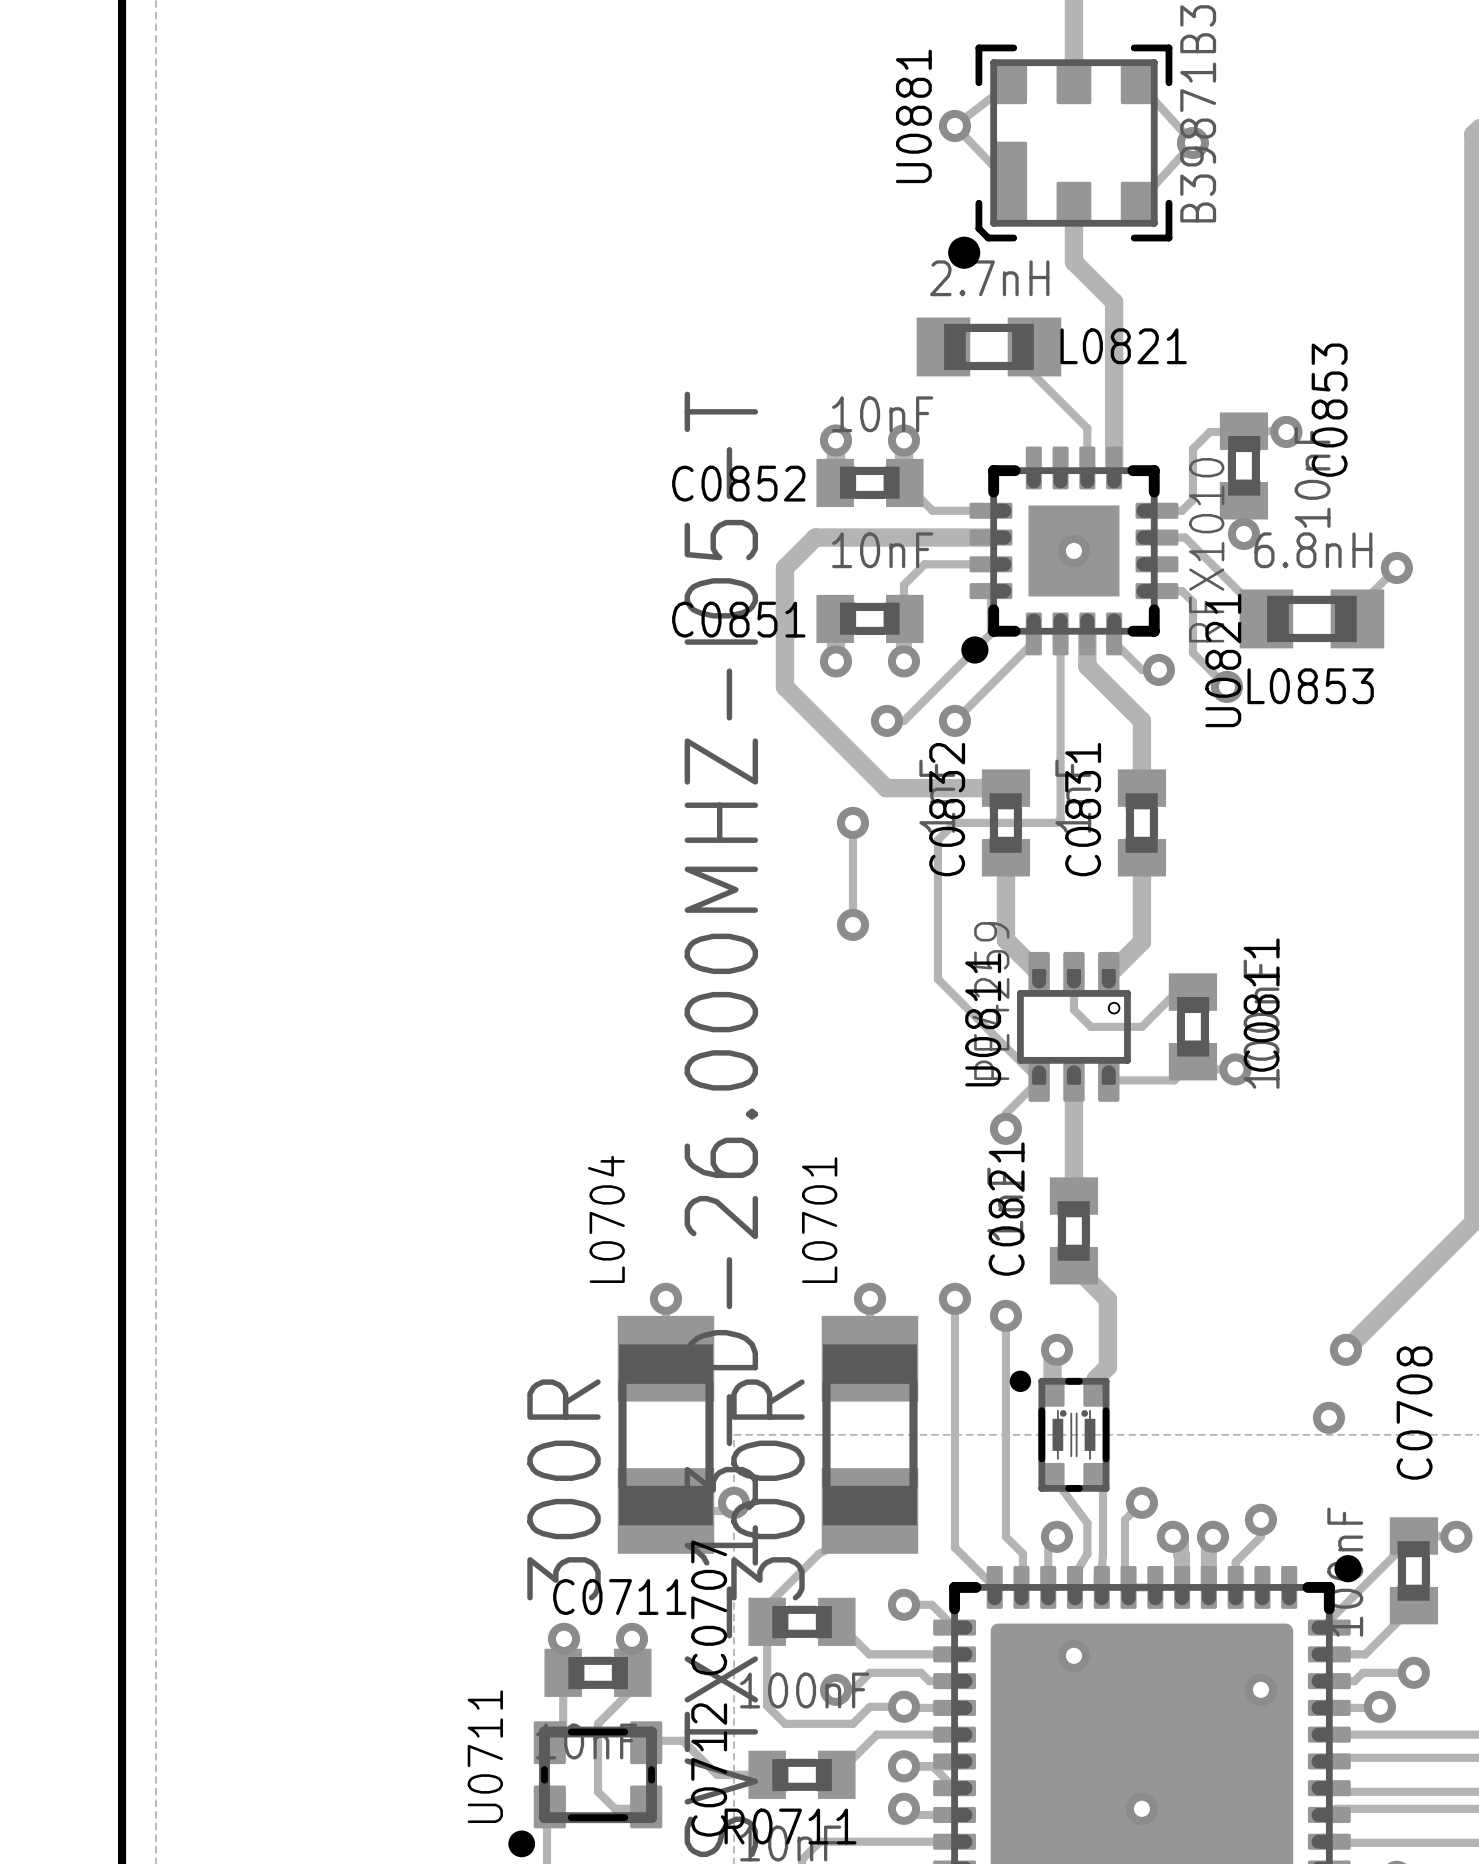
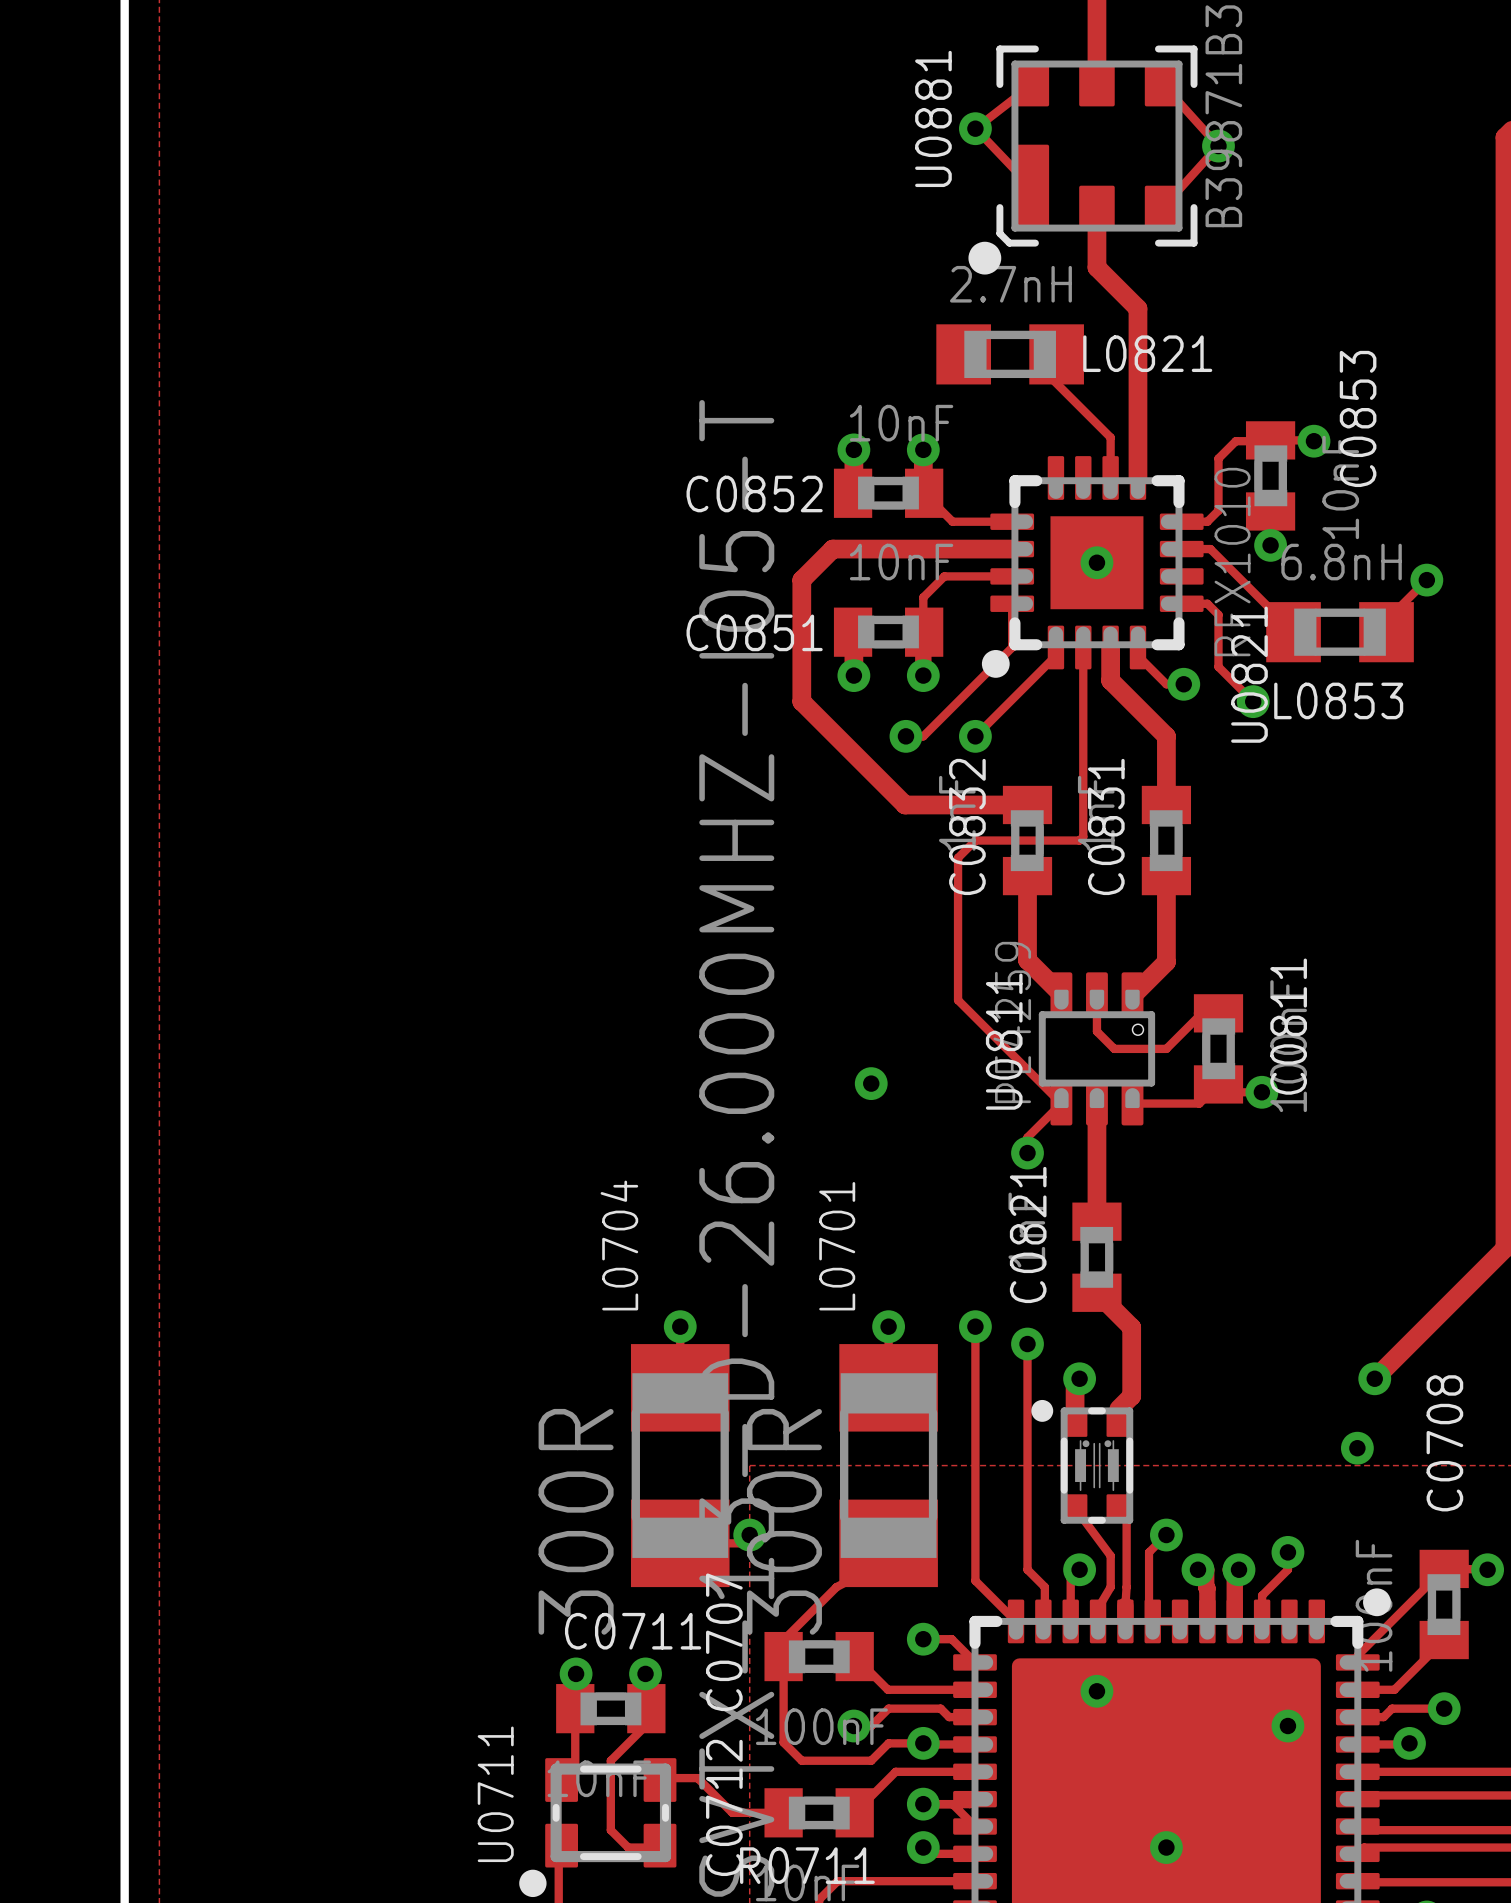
track: (852, 822) (852, 924) -> none
via: (852, 822) -> none
via: (852, 924) -> none
via: none -> (871, 1083)

